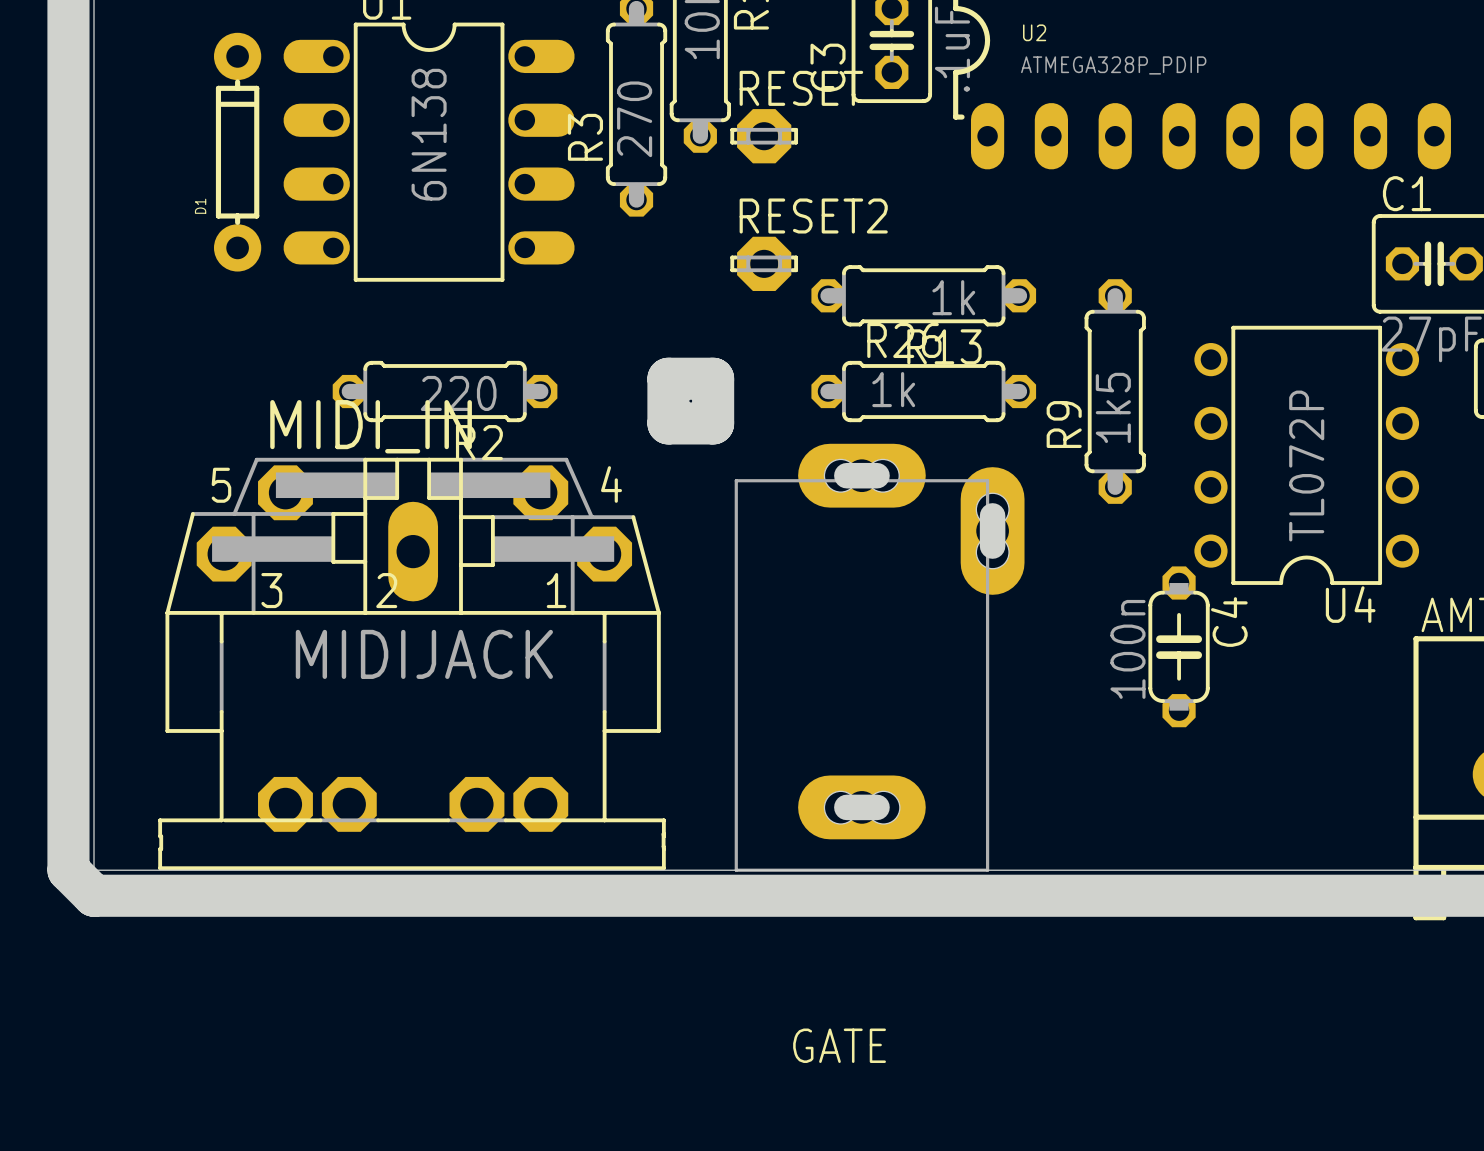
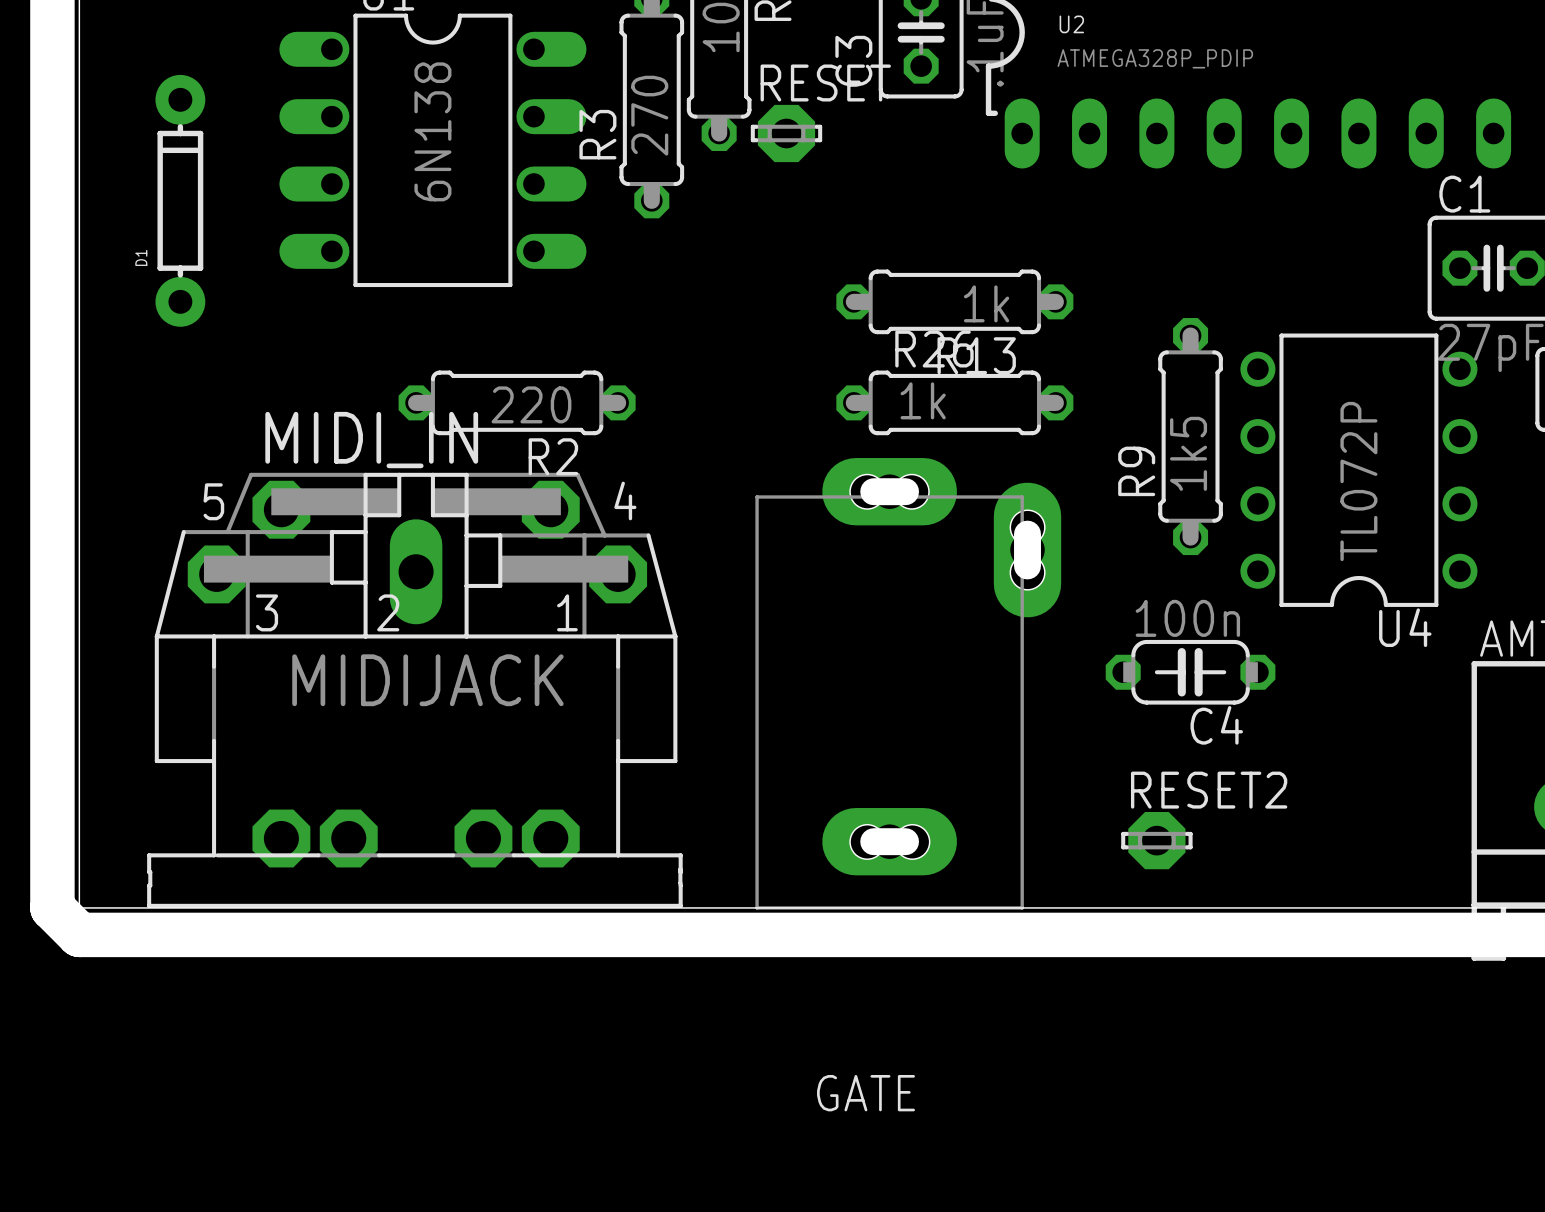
D1 position: (237, 152) -> (180, 200)
RESET2 position: (764, 263) -> (1156, 840)
board edge: (668, 378) (668, 423) (713, 423) (713, 378) (668, 378) -> none
R2 position: (445, 391) -> (517, 402)
R9 position: (1115, 391) -> (1190, 436)
C4 rotation: 0° (1179, 646) -> 90° clockwise (1190, 672)

